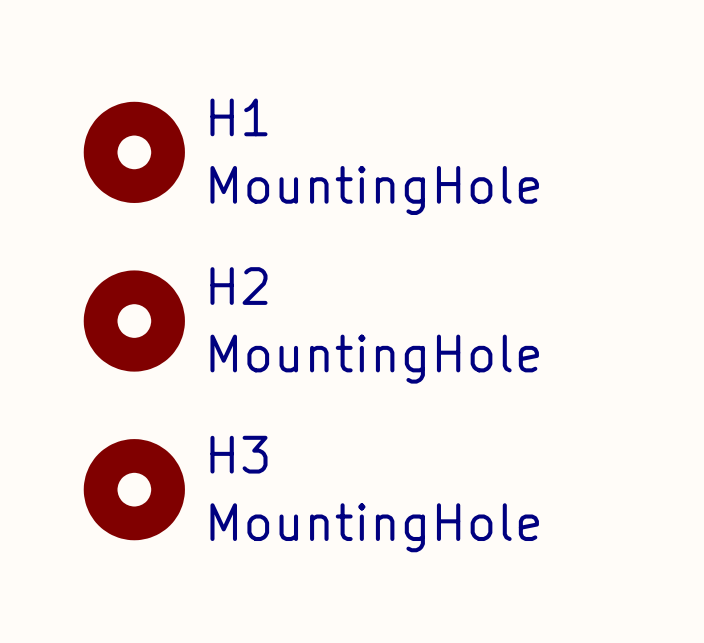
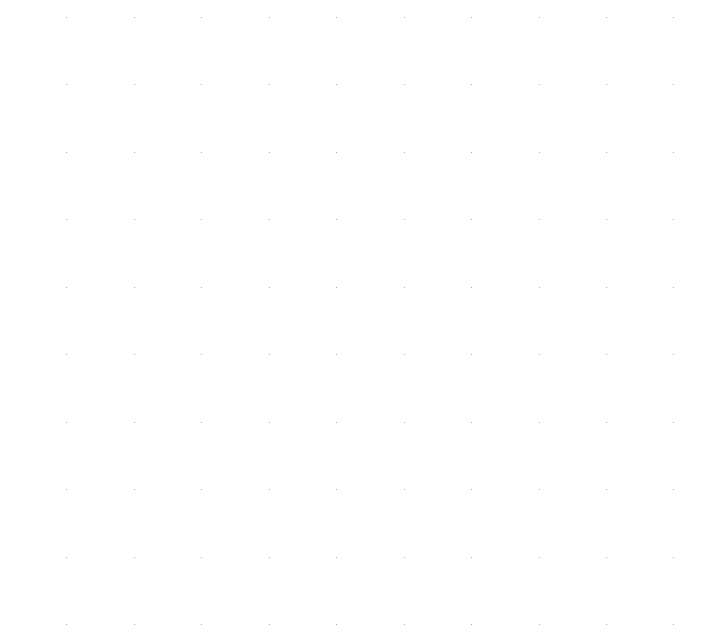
H1: MountingHole (134, 152) -> none
H2: MountingHole (134, 321) -> none
H3: MountingHole (134, 489) -> none

